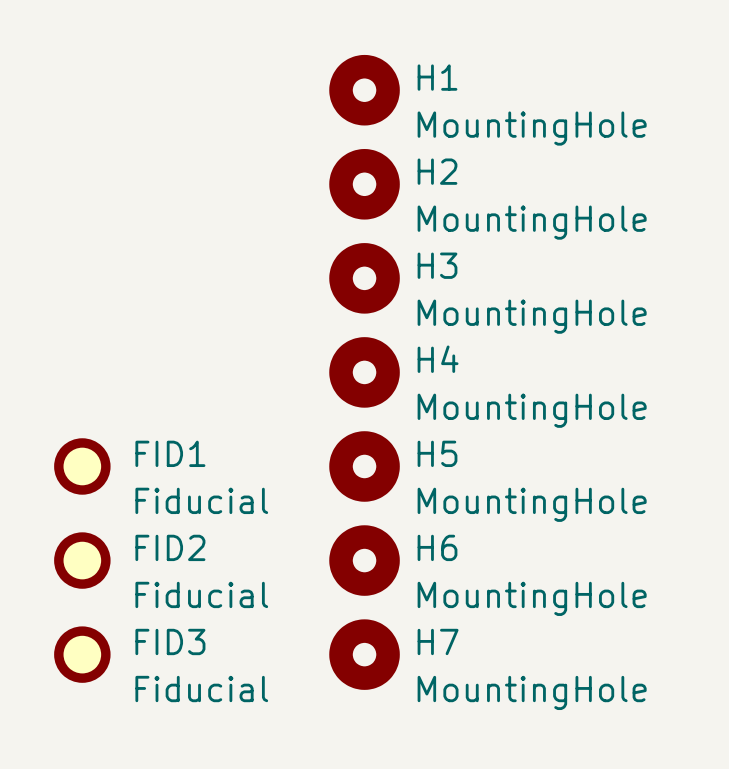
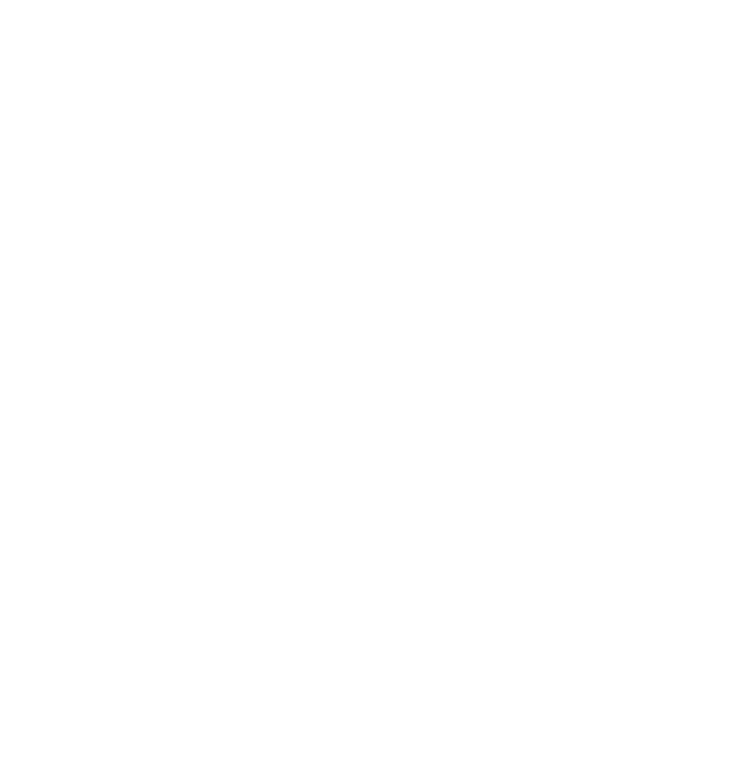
H1: MountingHole (364, 90) -> none
H2: MountingHole (364, 184) -> none
H3: MountingHole (364, 278) -> none
H4: MountingHole (364, 372) -> none
FID1: Fiducial (82, 466) -> none
H5: MountingHole (364, 466) -> none
FID2: Fiducial (82, 560) -> none
H6: MountingHole (364, 560) -> none
FID3: Fiducial (82, 654) -> none
H7: MountingHole (364, 654) -> none

